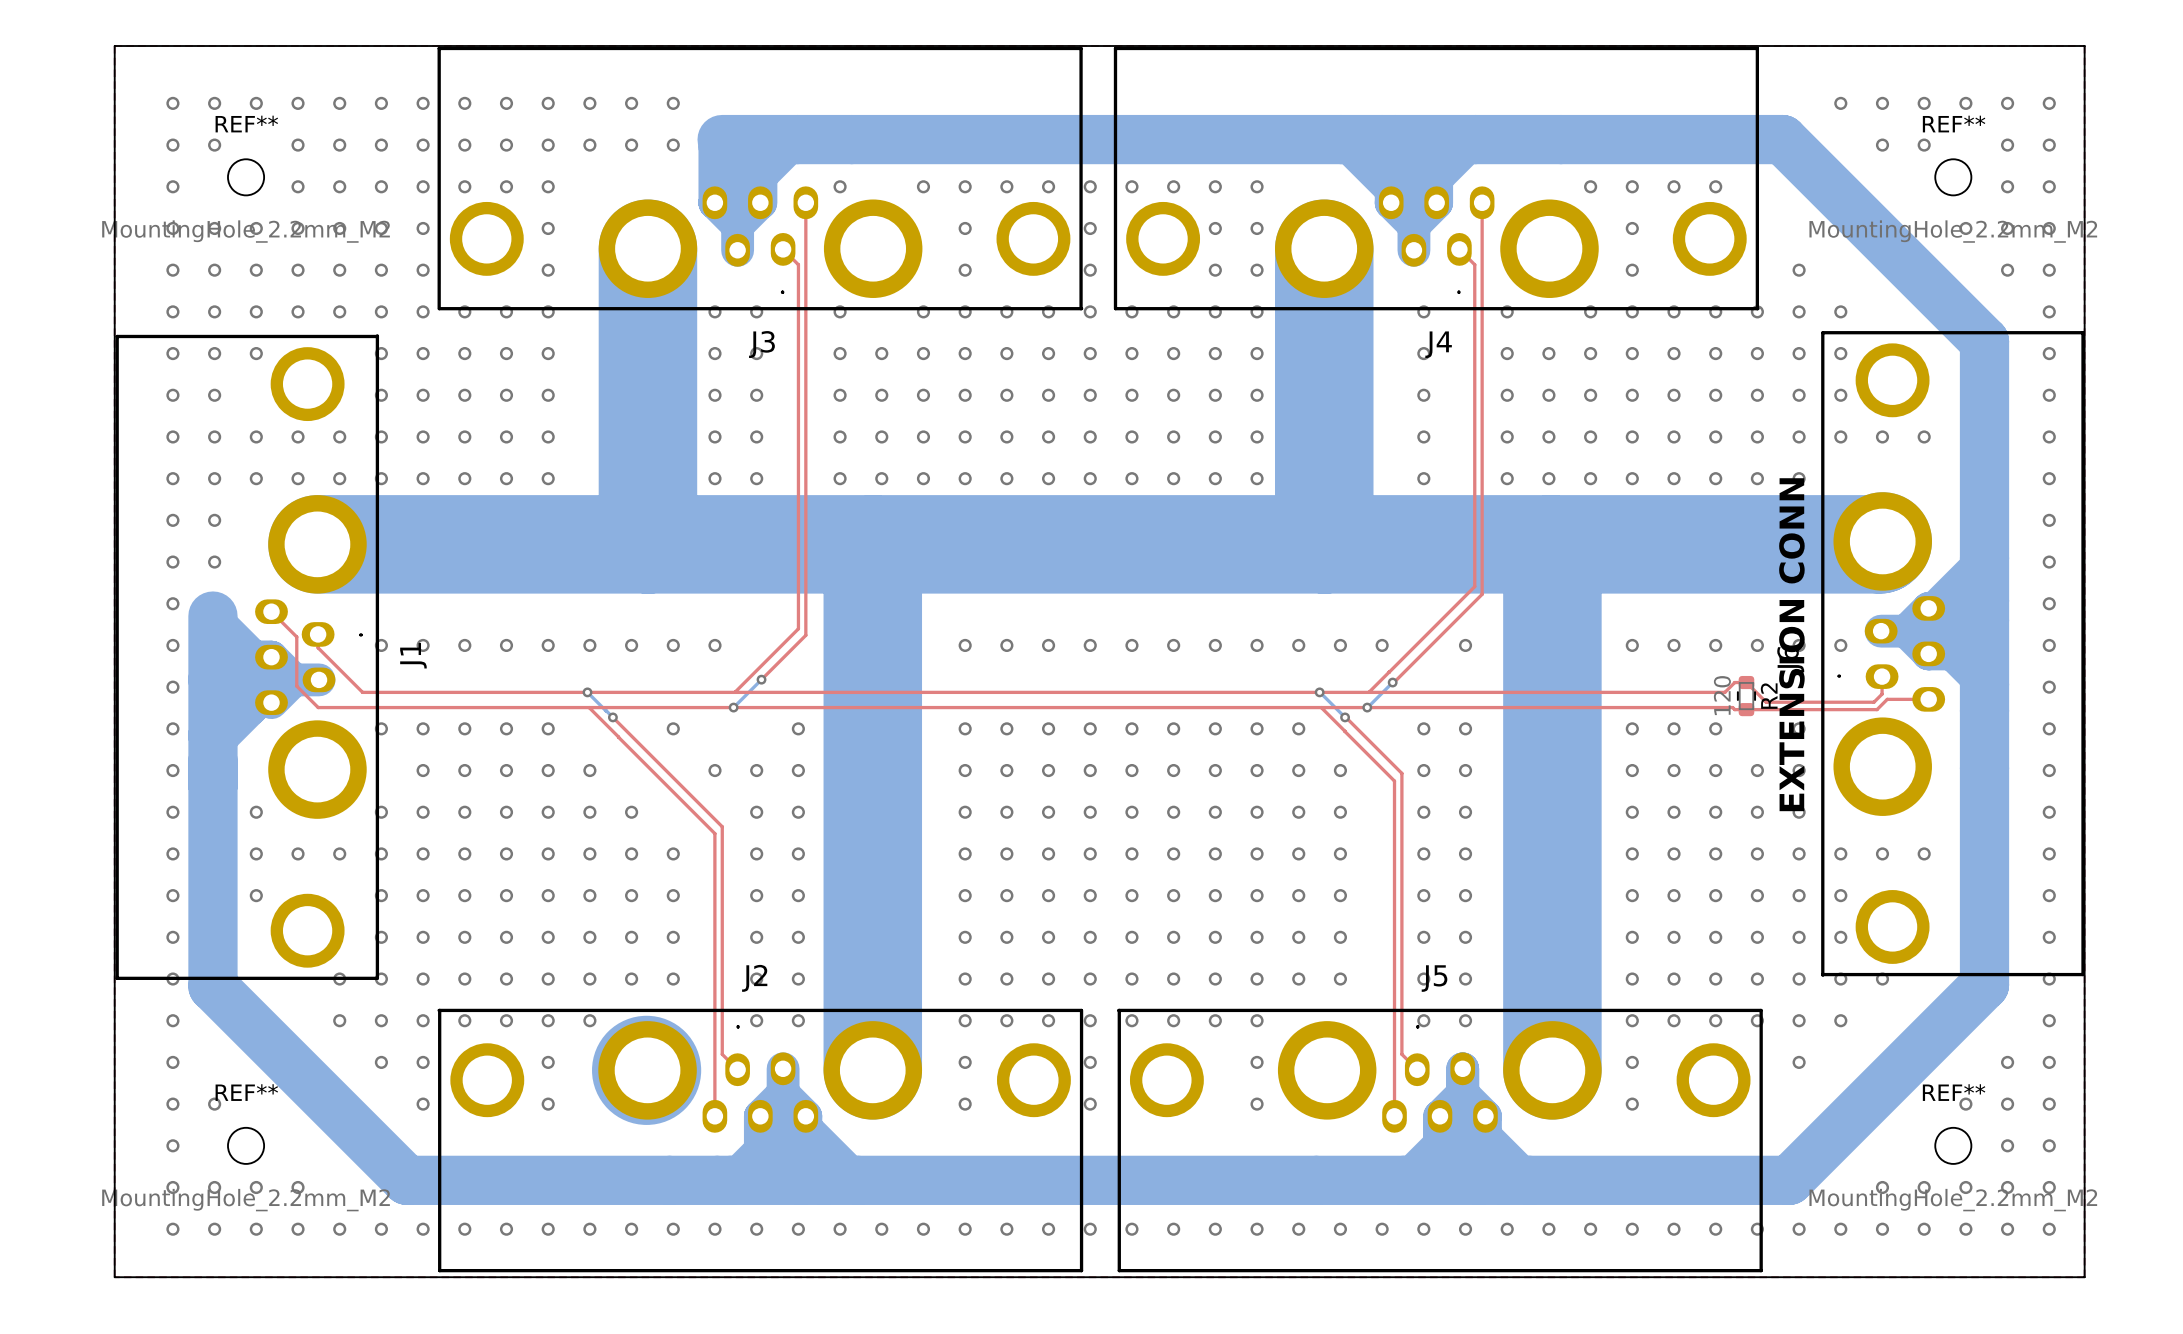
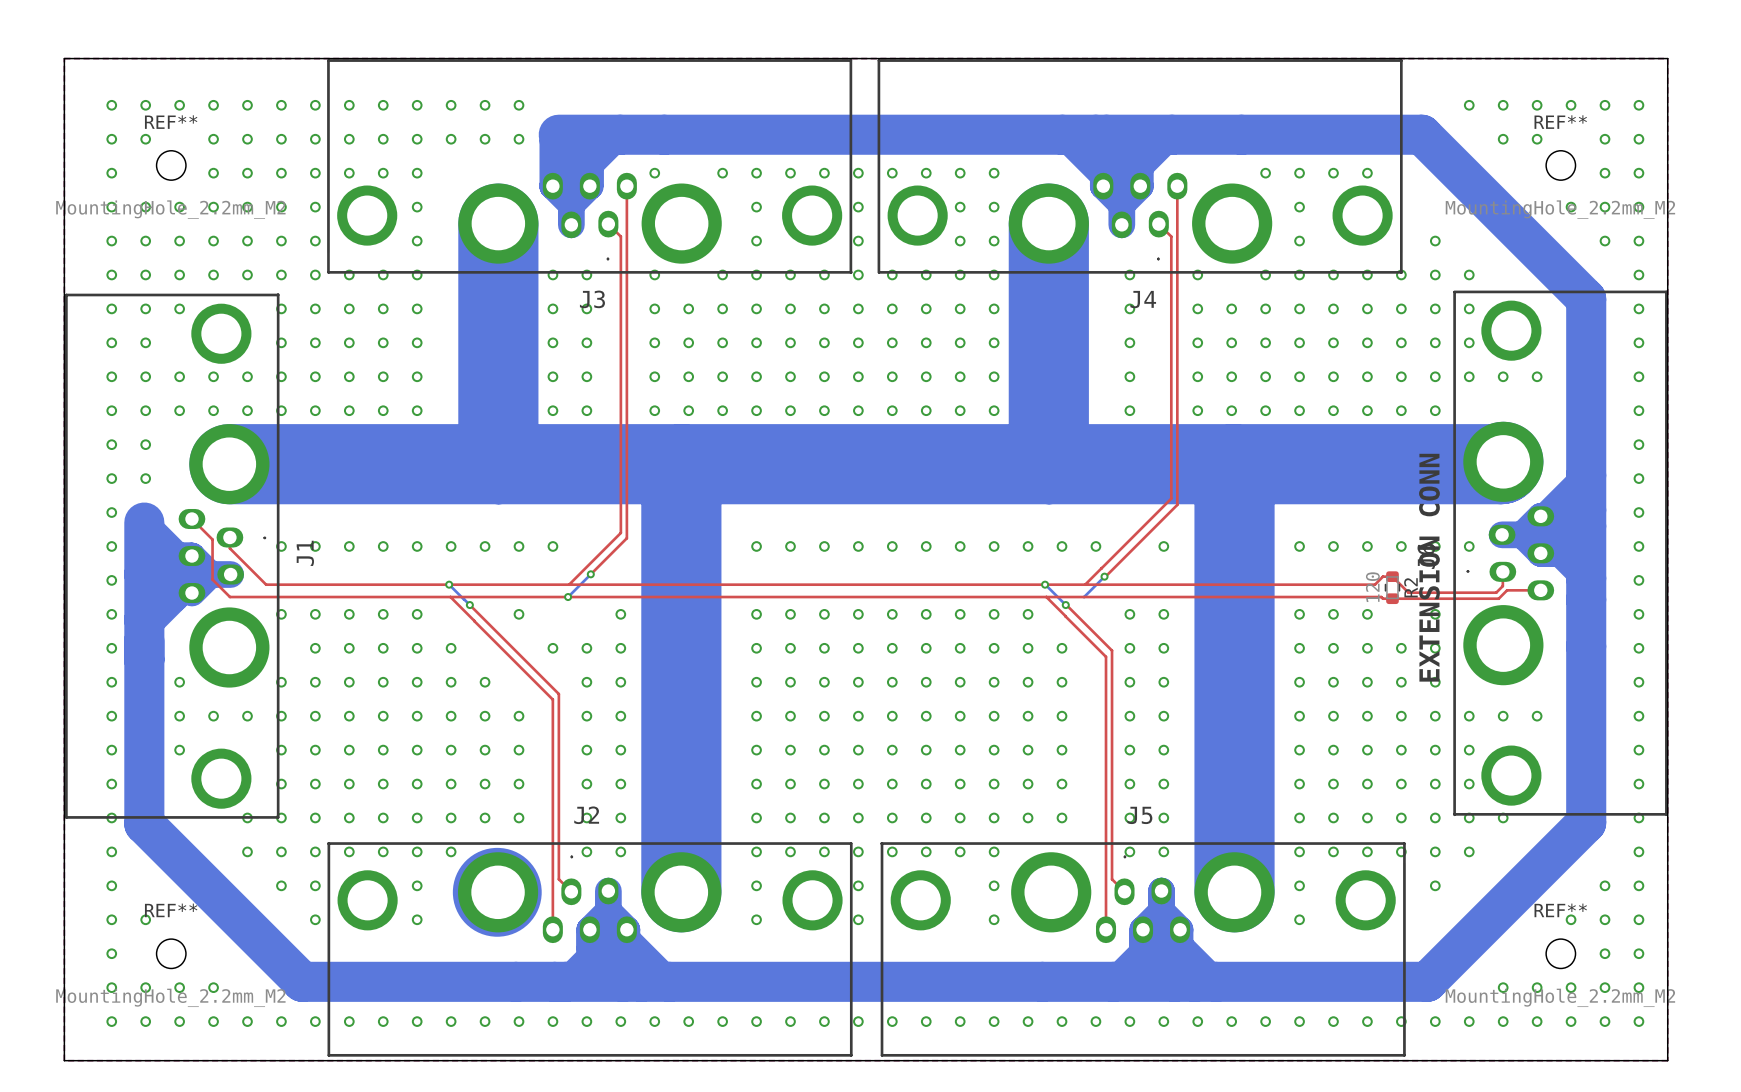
via: (1367, 707) -> none

